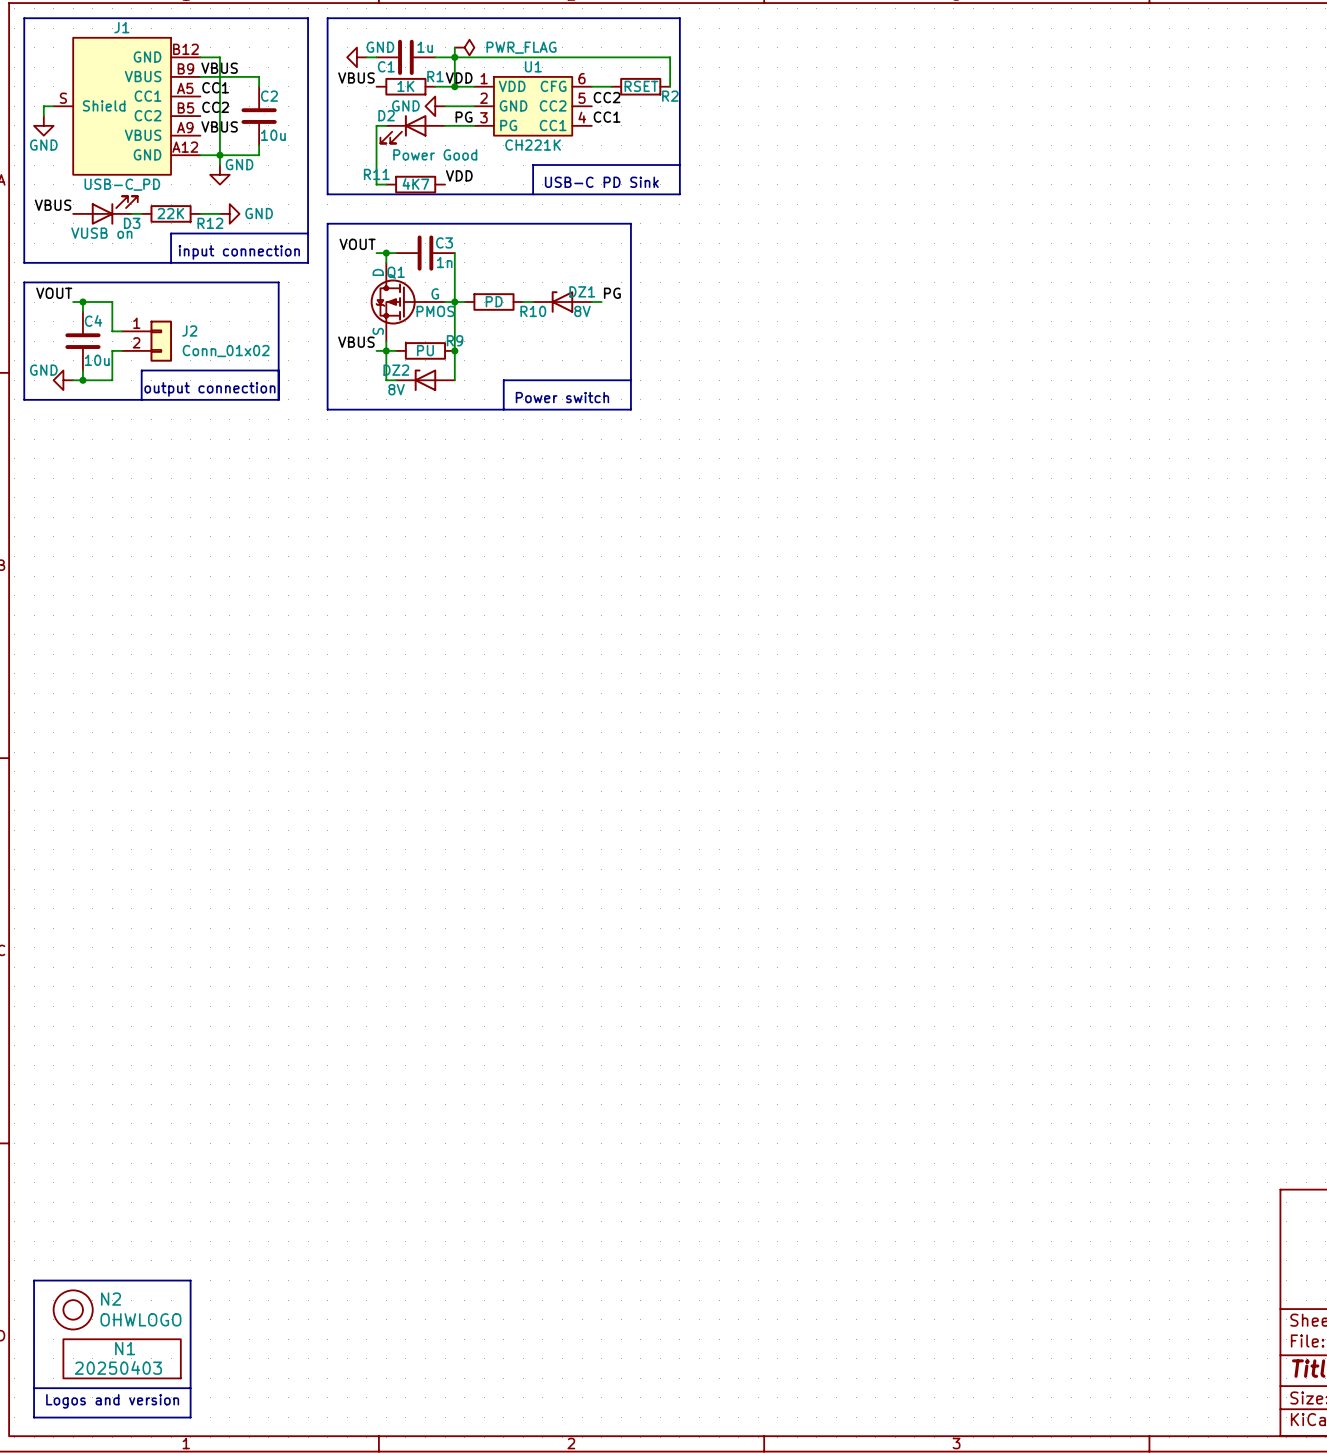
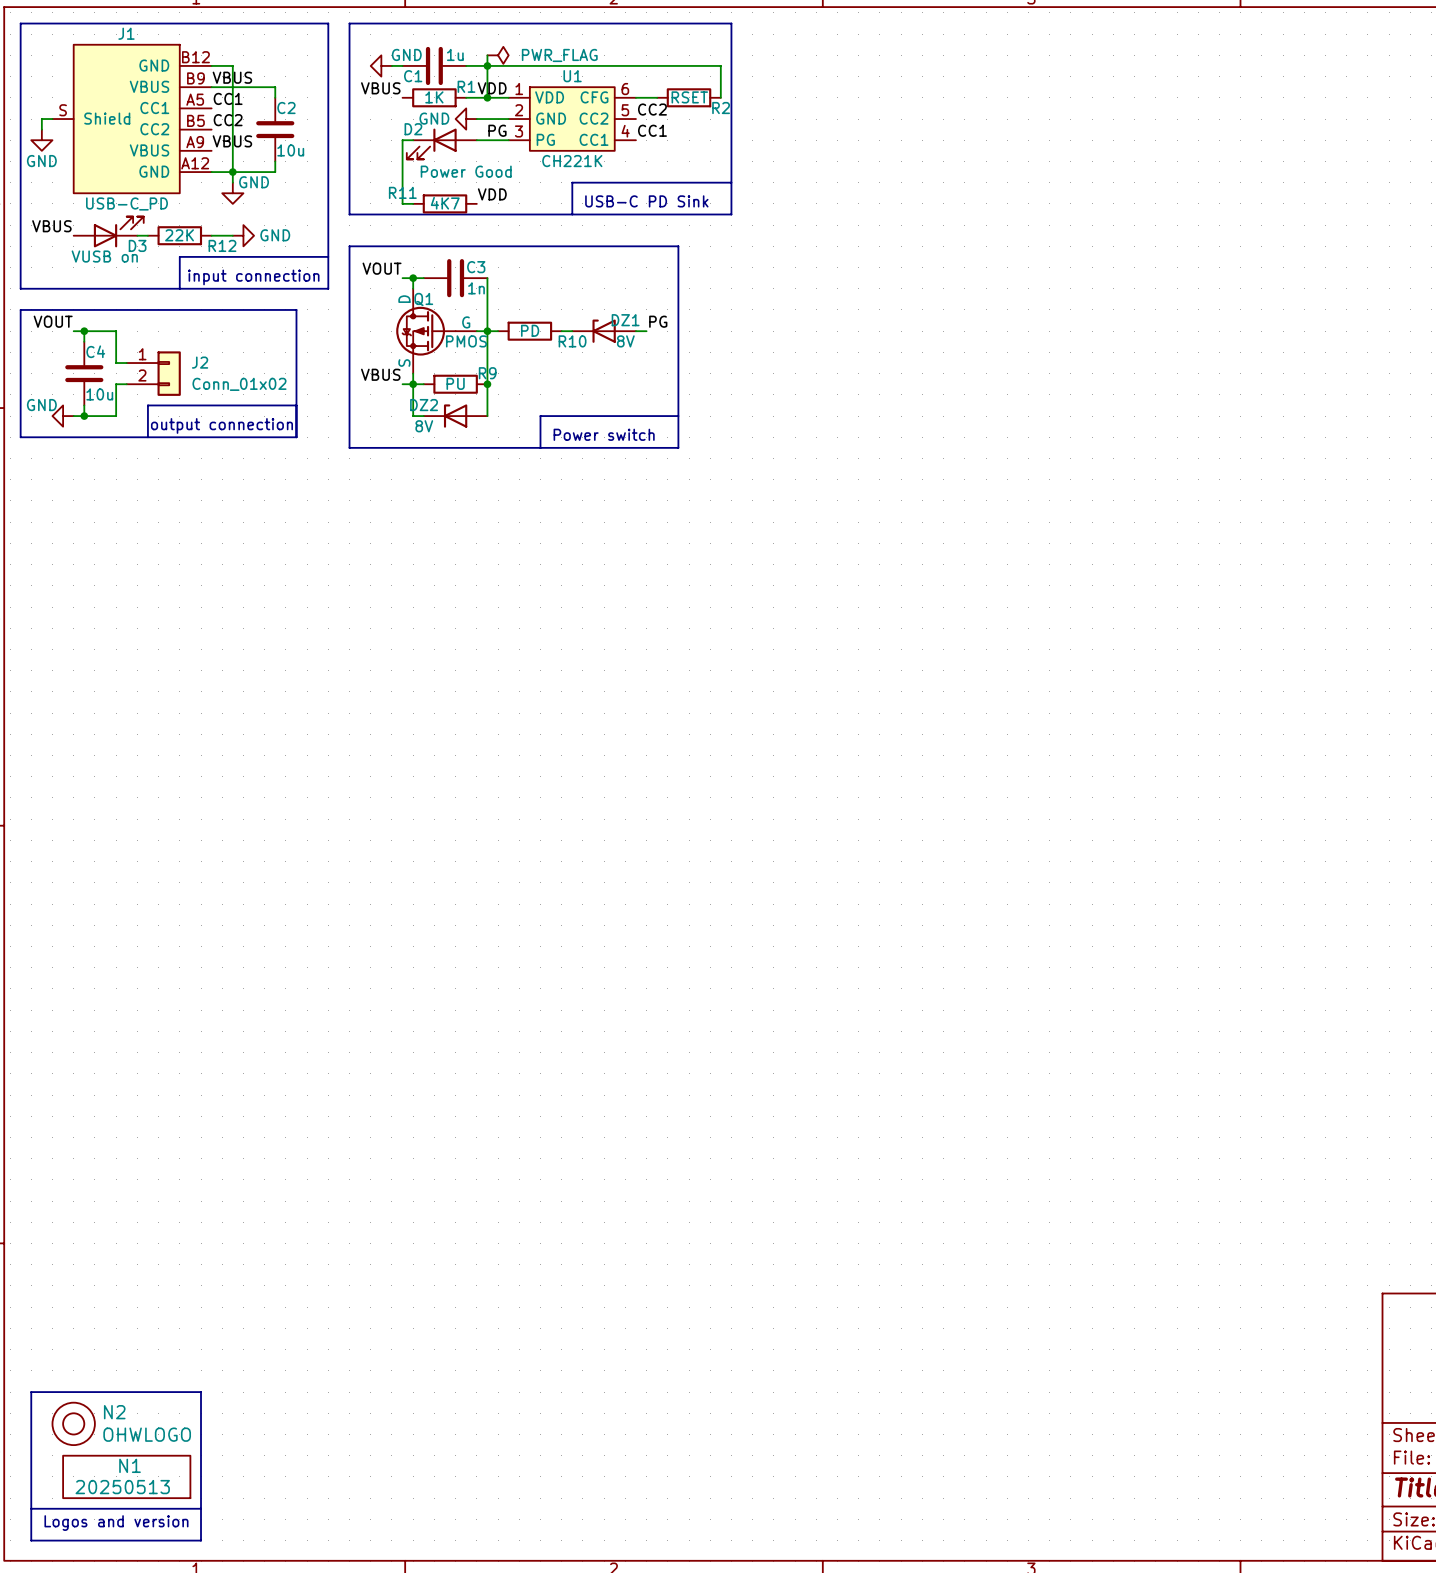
N1 value: 20250403 (118, 1367) -> 20250513 (122, 1487)

